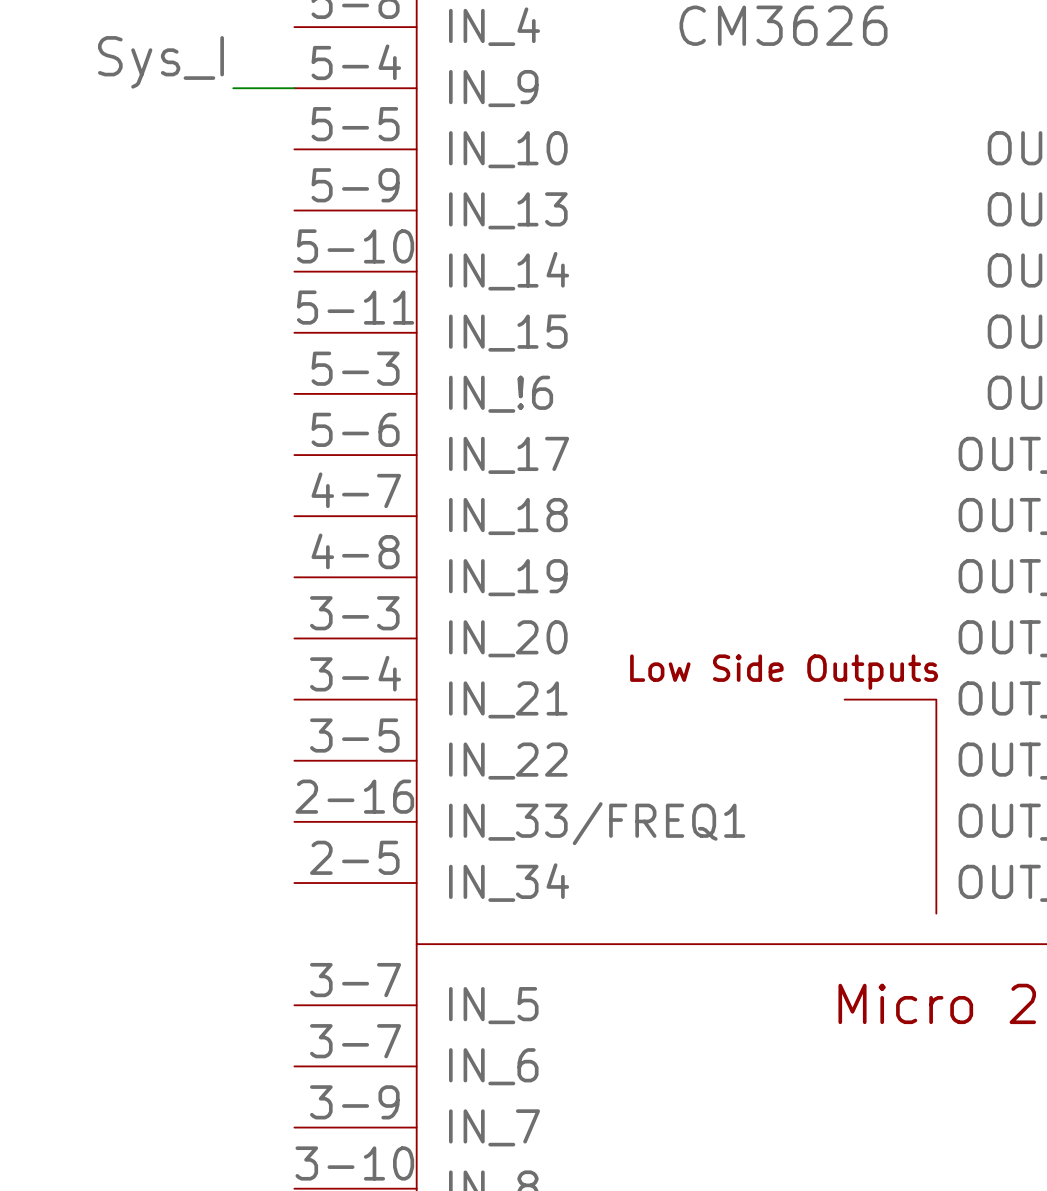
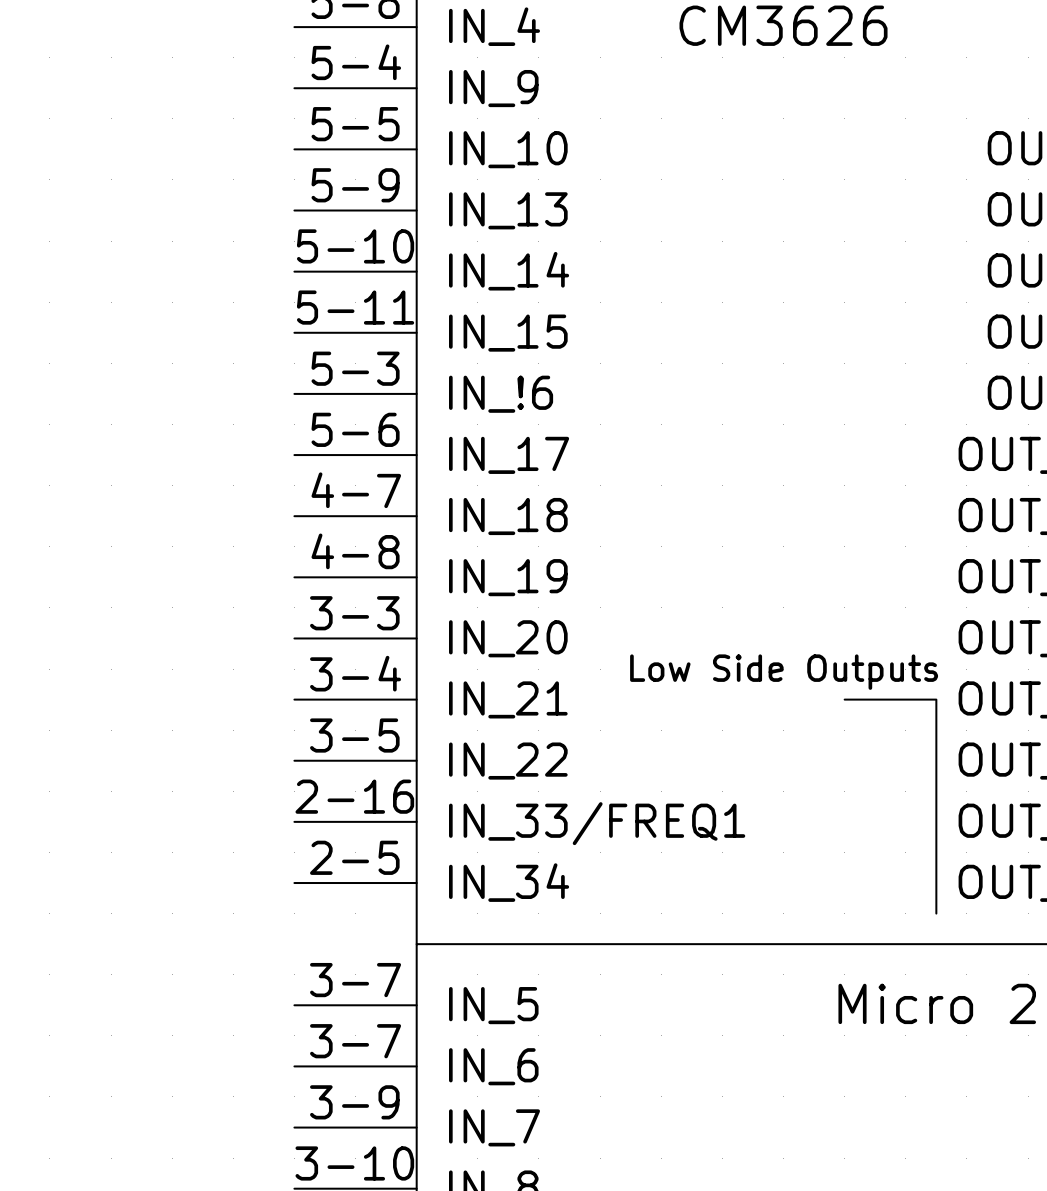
label: Sys_I (160, 62) -> none
wire: (233, 88) (294, 88) -> none

